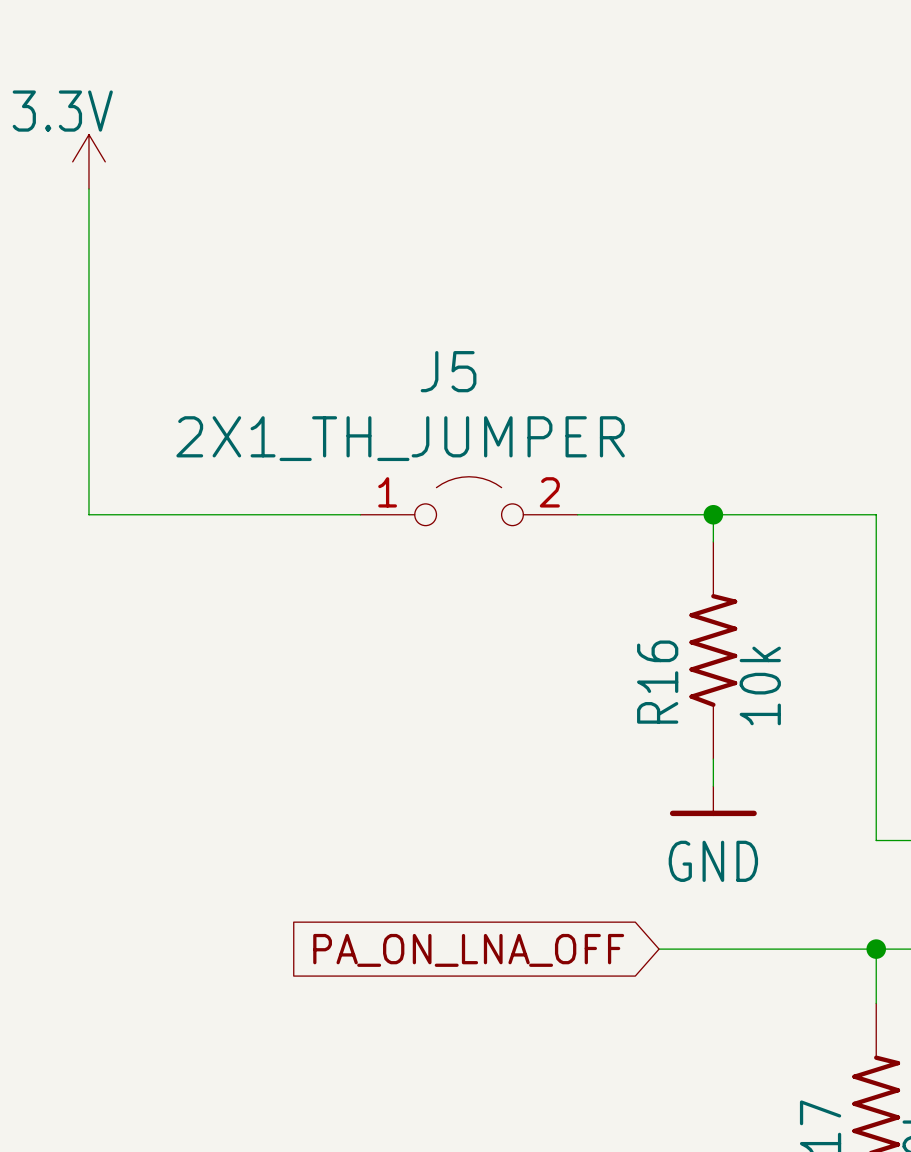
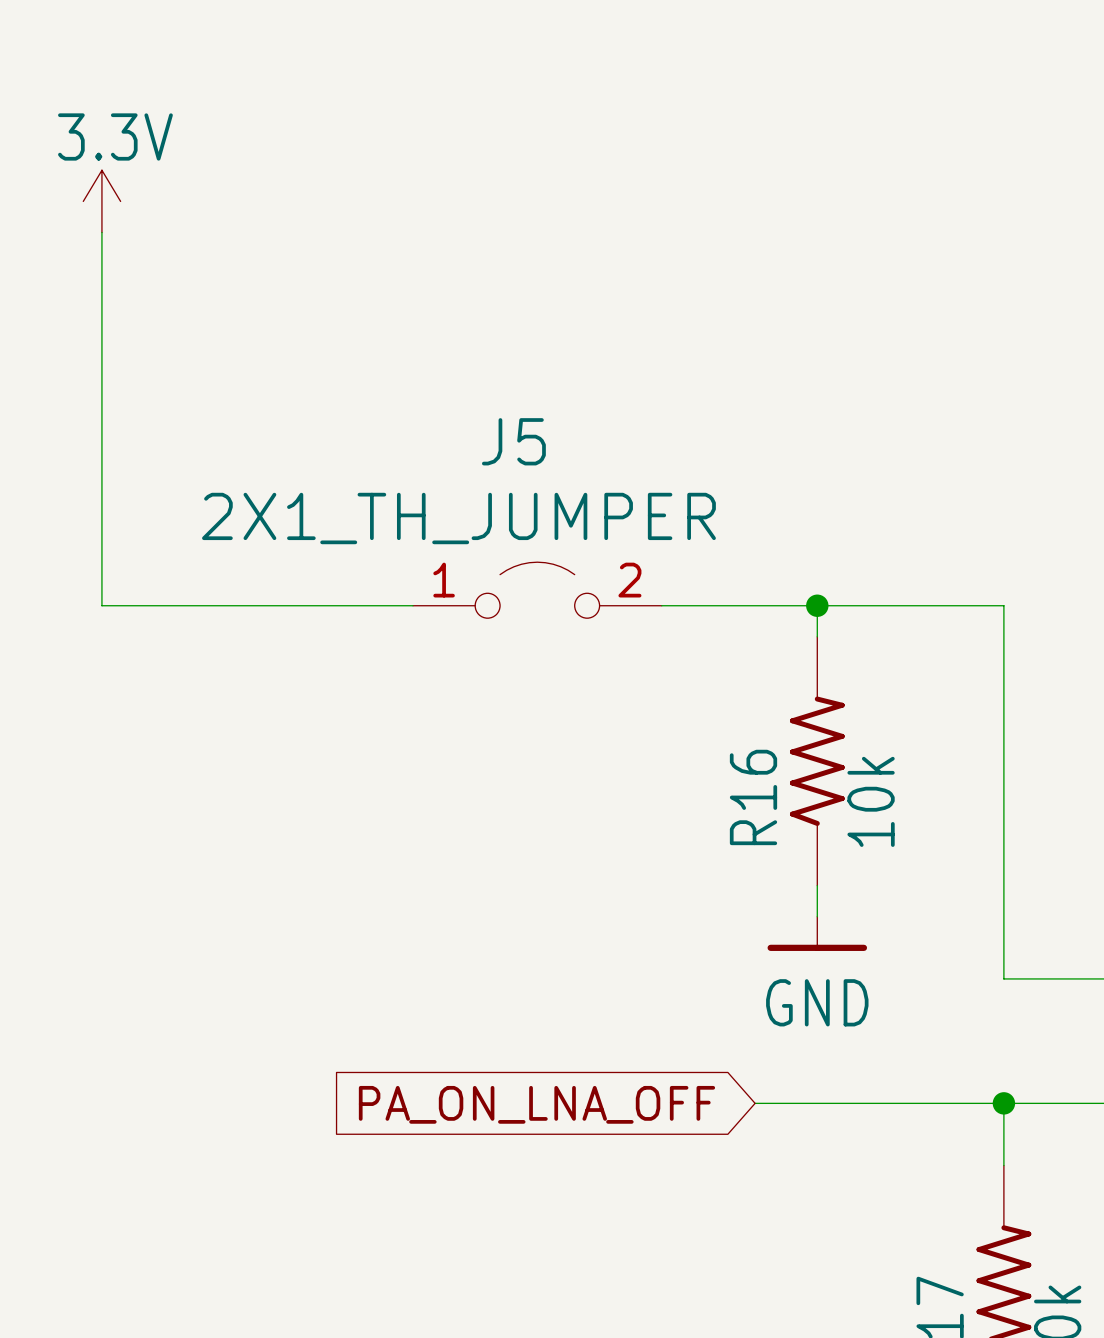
power symbol text position: 3.3V (62, 111) -> 3.3V (115, 136)

